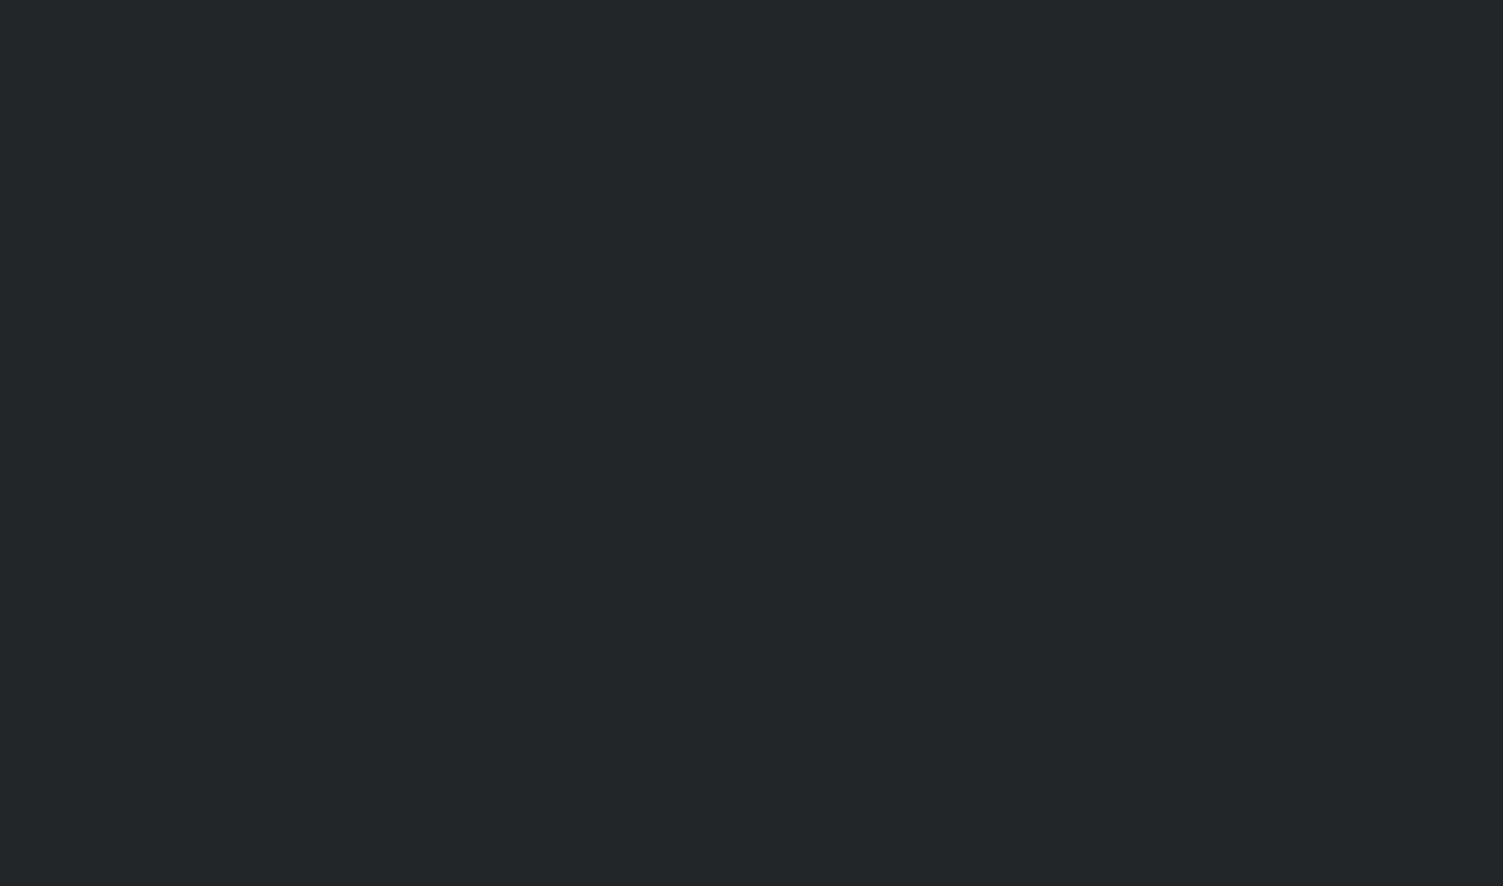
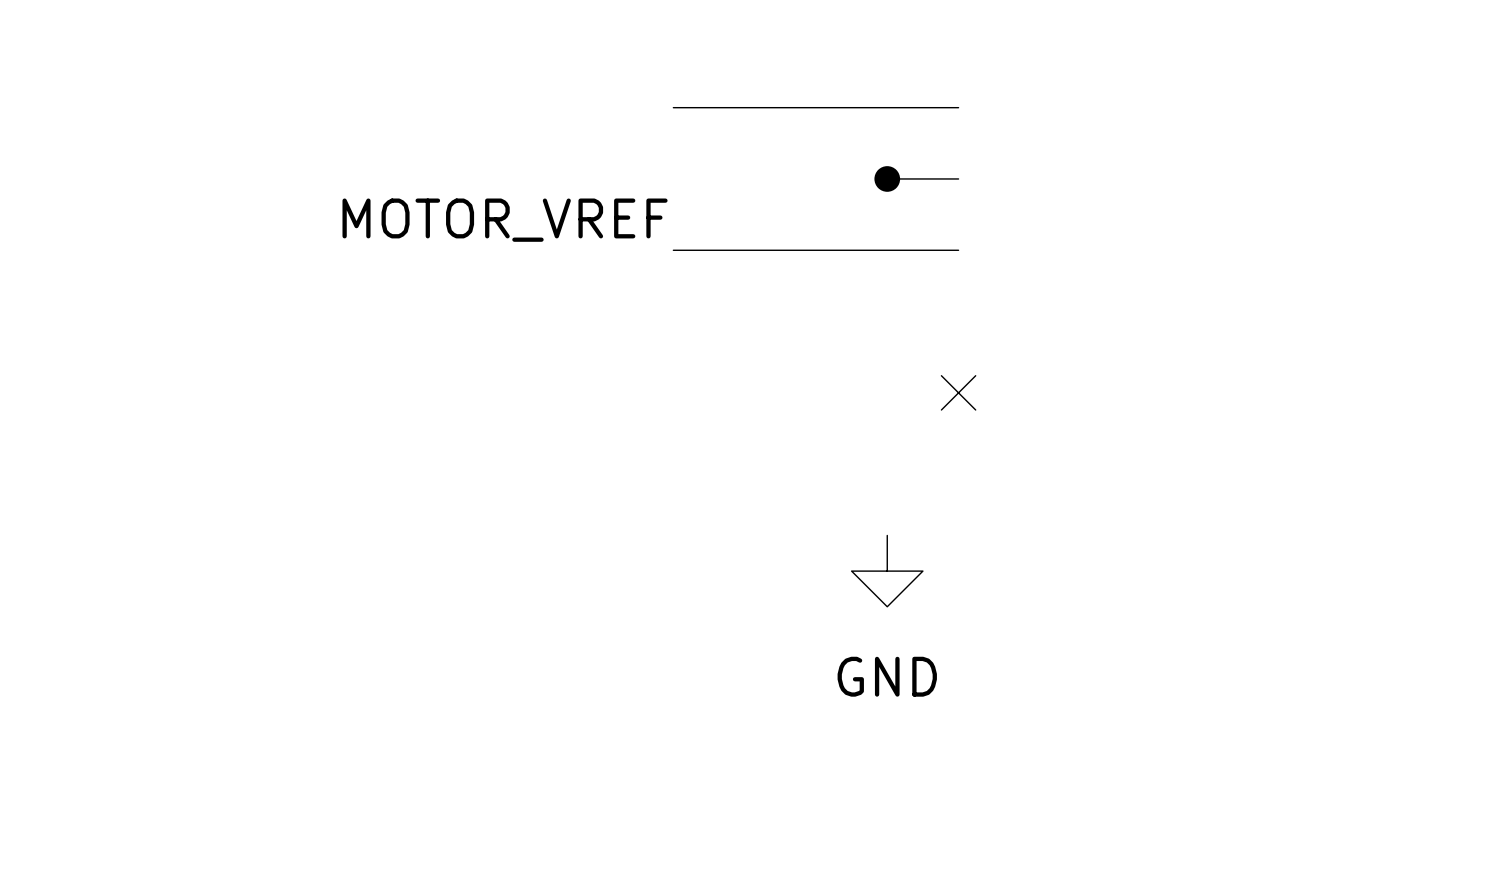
wire: none -> (673, 107) (958, 107)
wire: none -> (887, 178) (958, 178)
junction: none -> (887, 178)
label: none -> MOTOR_VREF (505, 220)
wire: none -> (673, 250) (958, 250)
no-connect mark: none -> (958, 392)
power symbol: none -> GND (887, 571)

